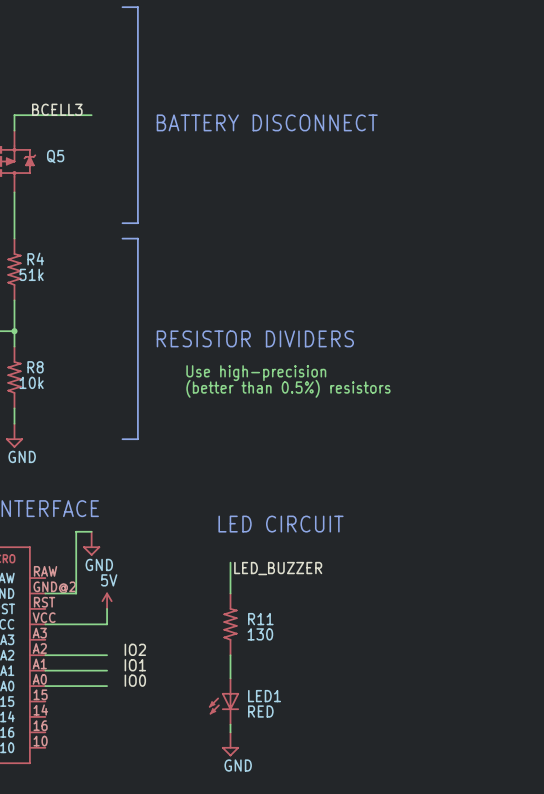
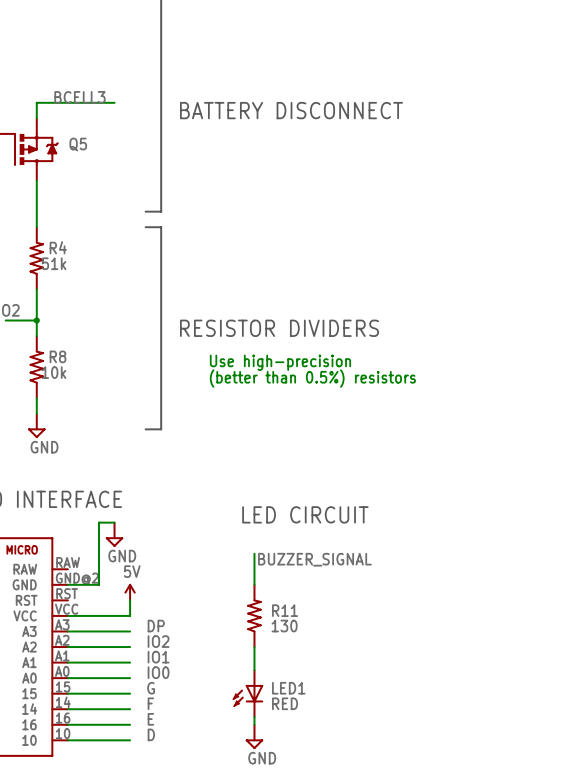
label: LED_BUZZER (278, 568) -> BUZZER_SIGNAL (314, 559)
label: none -> DP (156, 626)
wire: none -> (67, 631) (130, 631)
label: none -> G (151, 688)
wire: none -> (67, 693) (130, 693)
label: none -> F (150, 703)
wire: none -> (67, 709) (130, 709)
label: none -> E (150, 719)
wire: none -> (67, 724) (130, 724)
label: none -> D (151, 734)
wire: none -> (67, 740) (130, 740)

